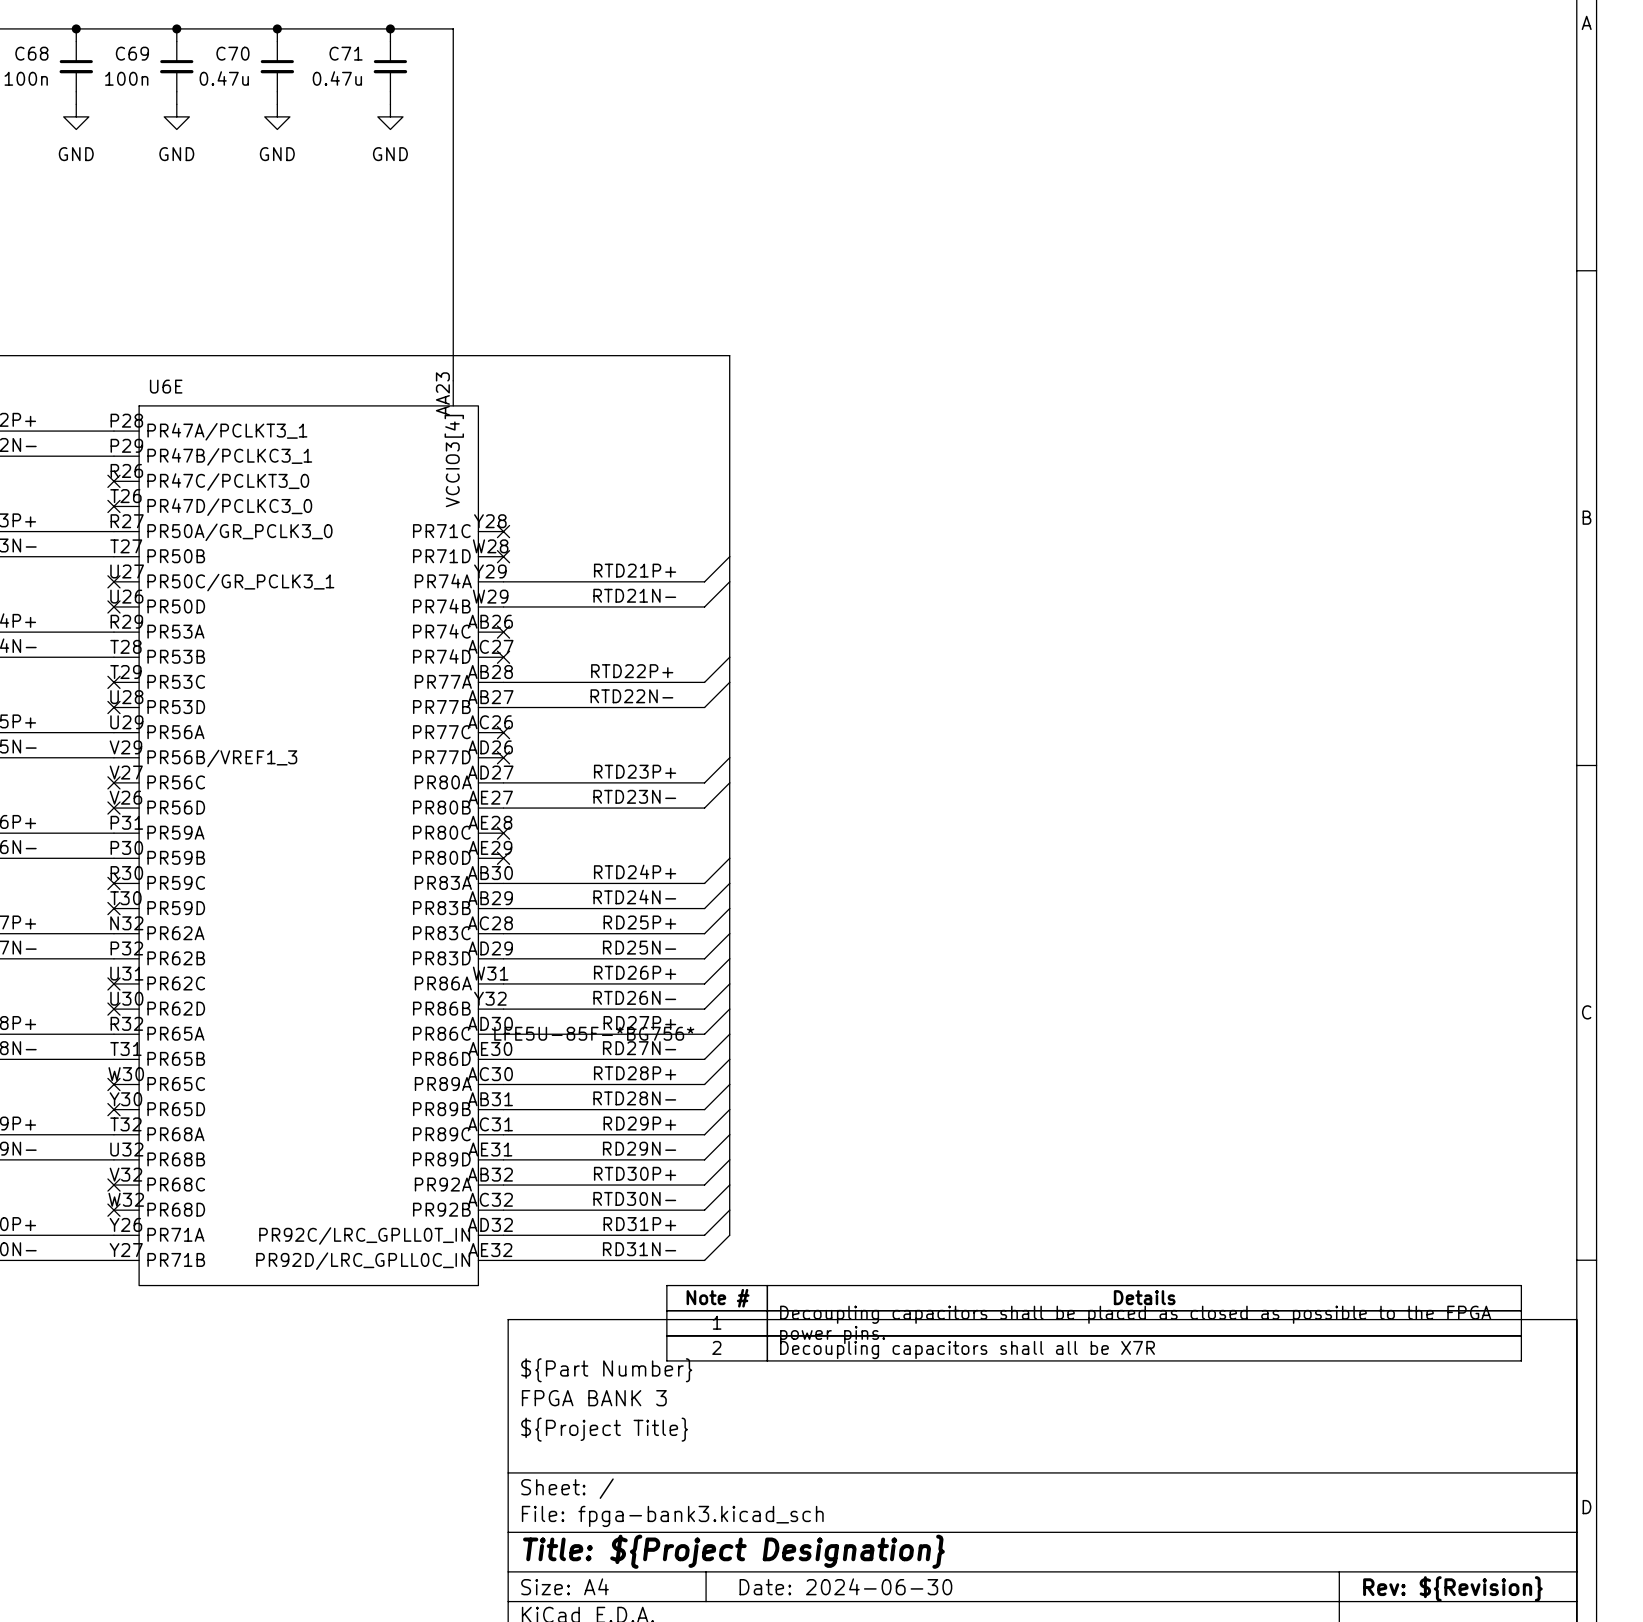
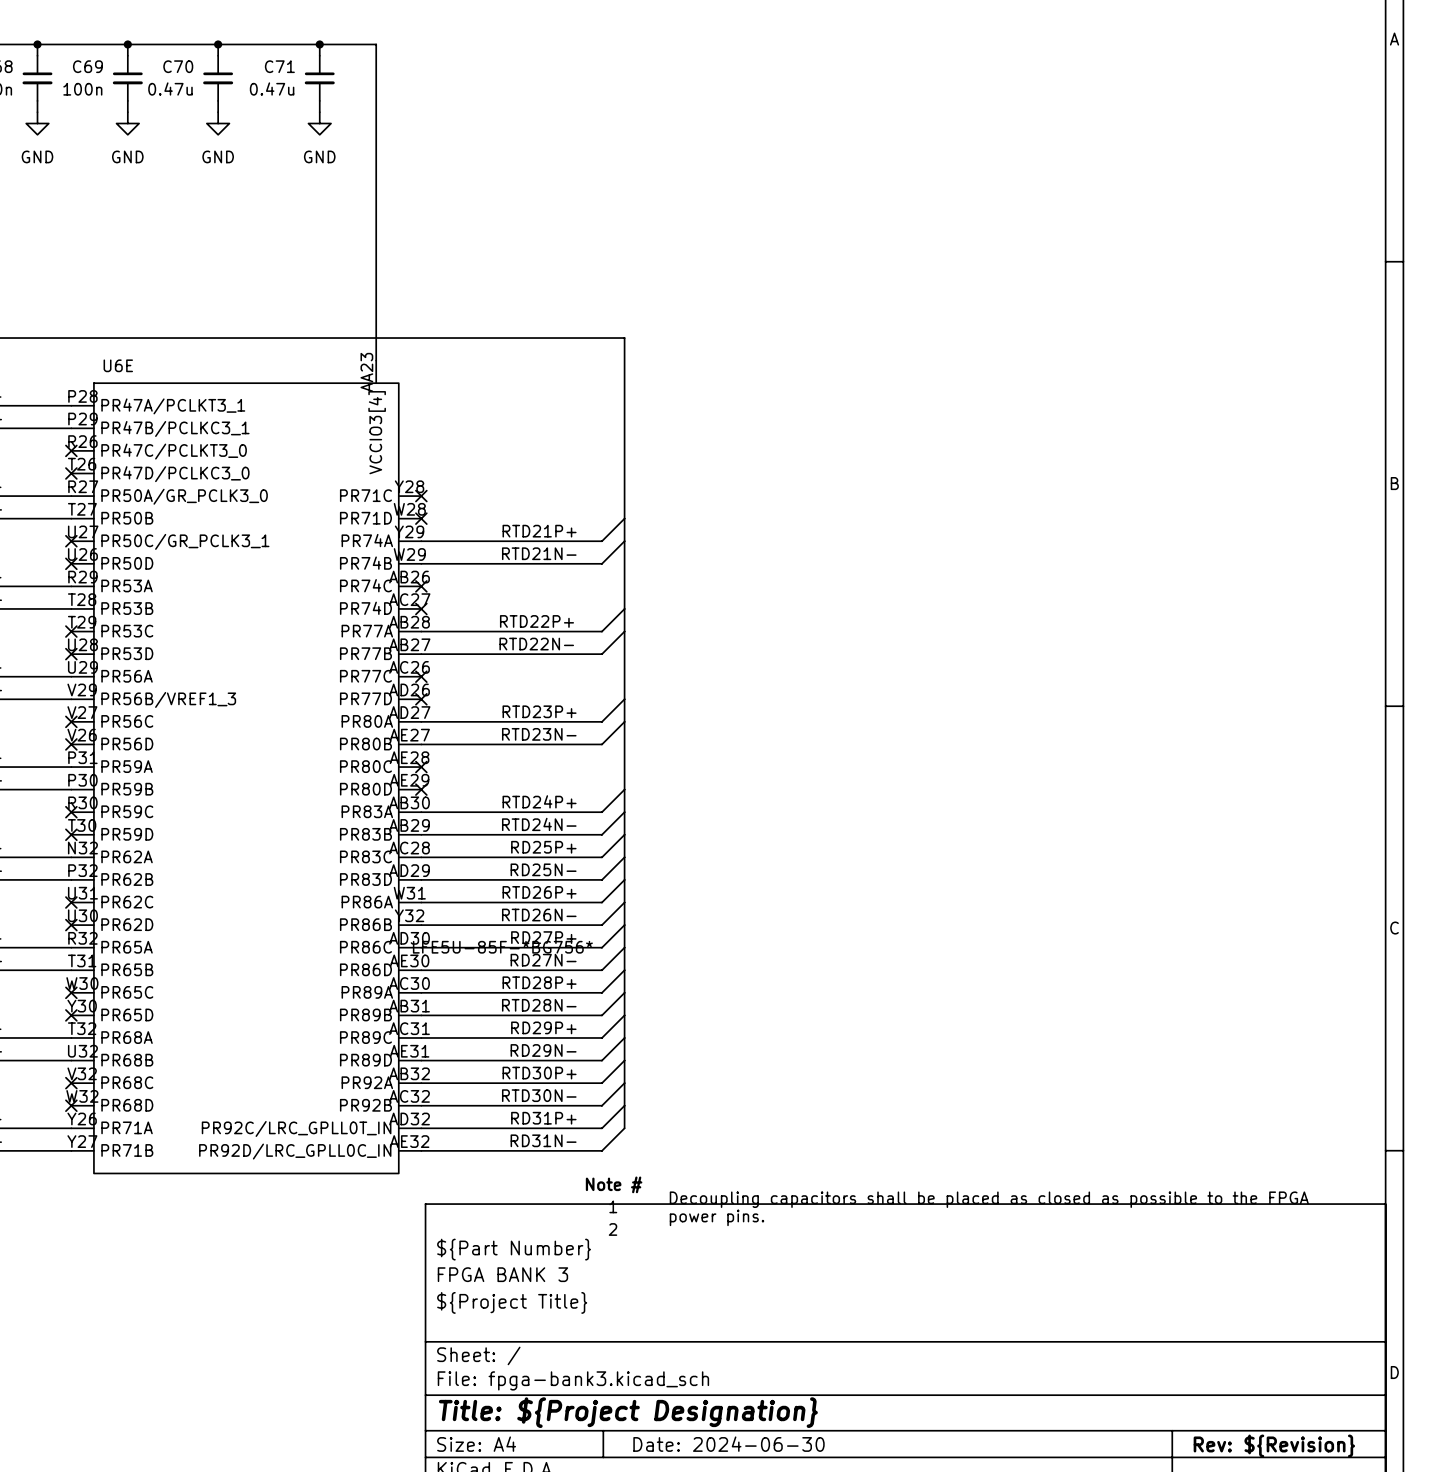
line: (666, 1285) (666, 1360) (1521, 1360) (1521, 1285) (666, 1285) -> none
line: (767, 1285) (767, 1360) -> none
text: Details (1144, 1297) -> none
line: (666, 1310) (1521, 1310) -> none
line: (666, 1335) (1521, 1335) -> none
text: Decoupling capacitors shall all be X7R (967, 1350) -> none

